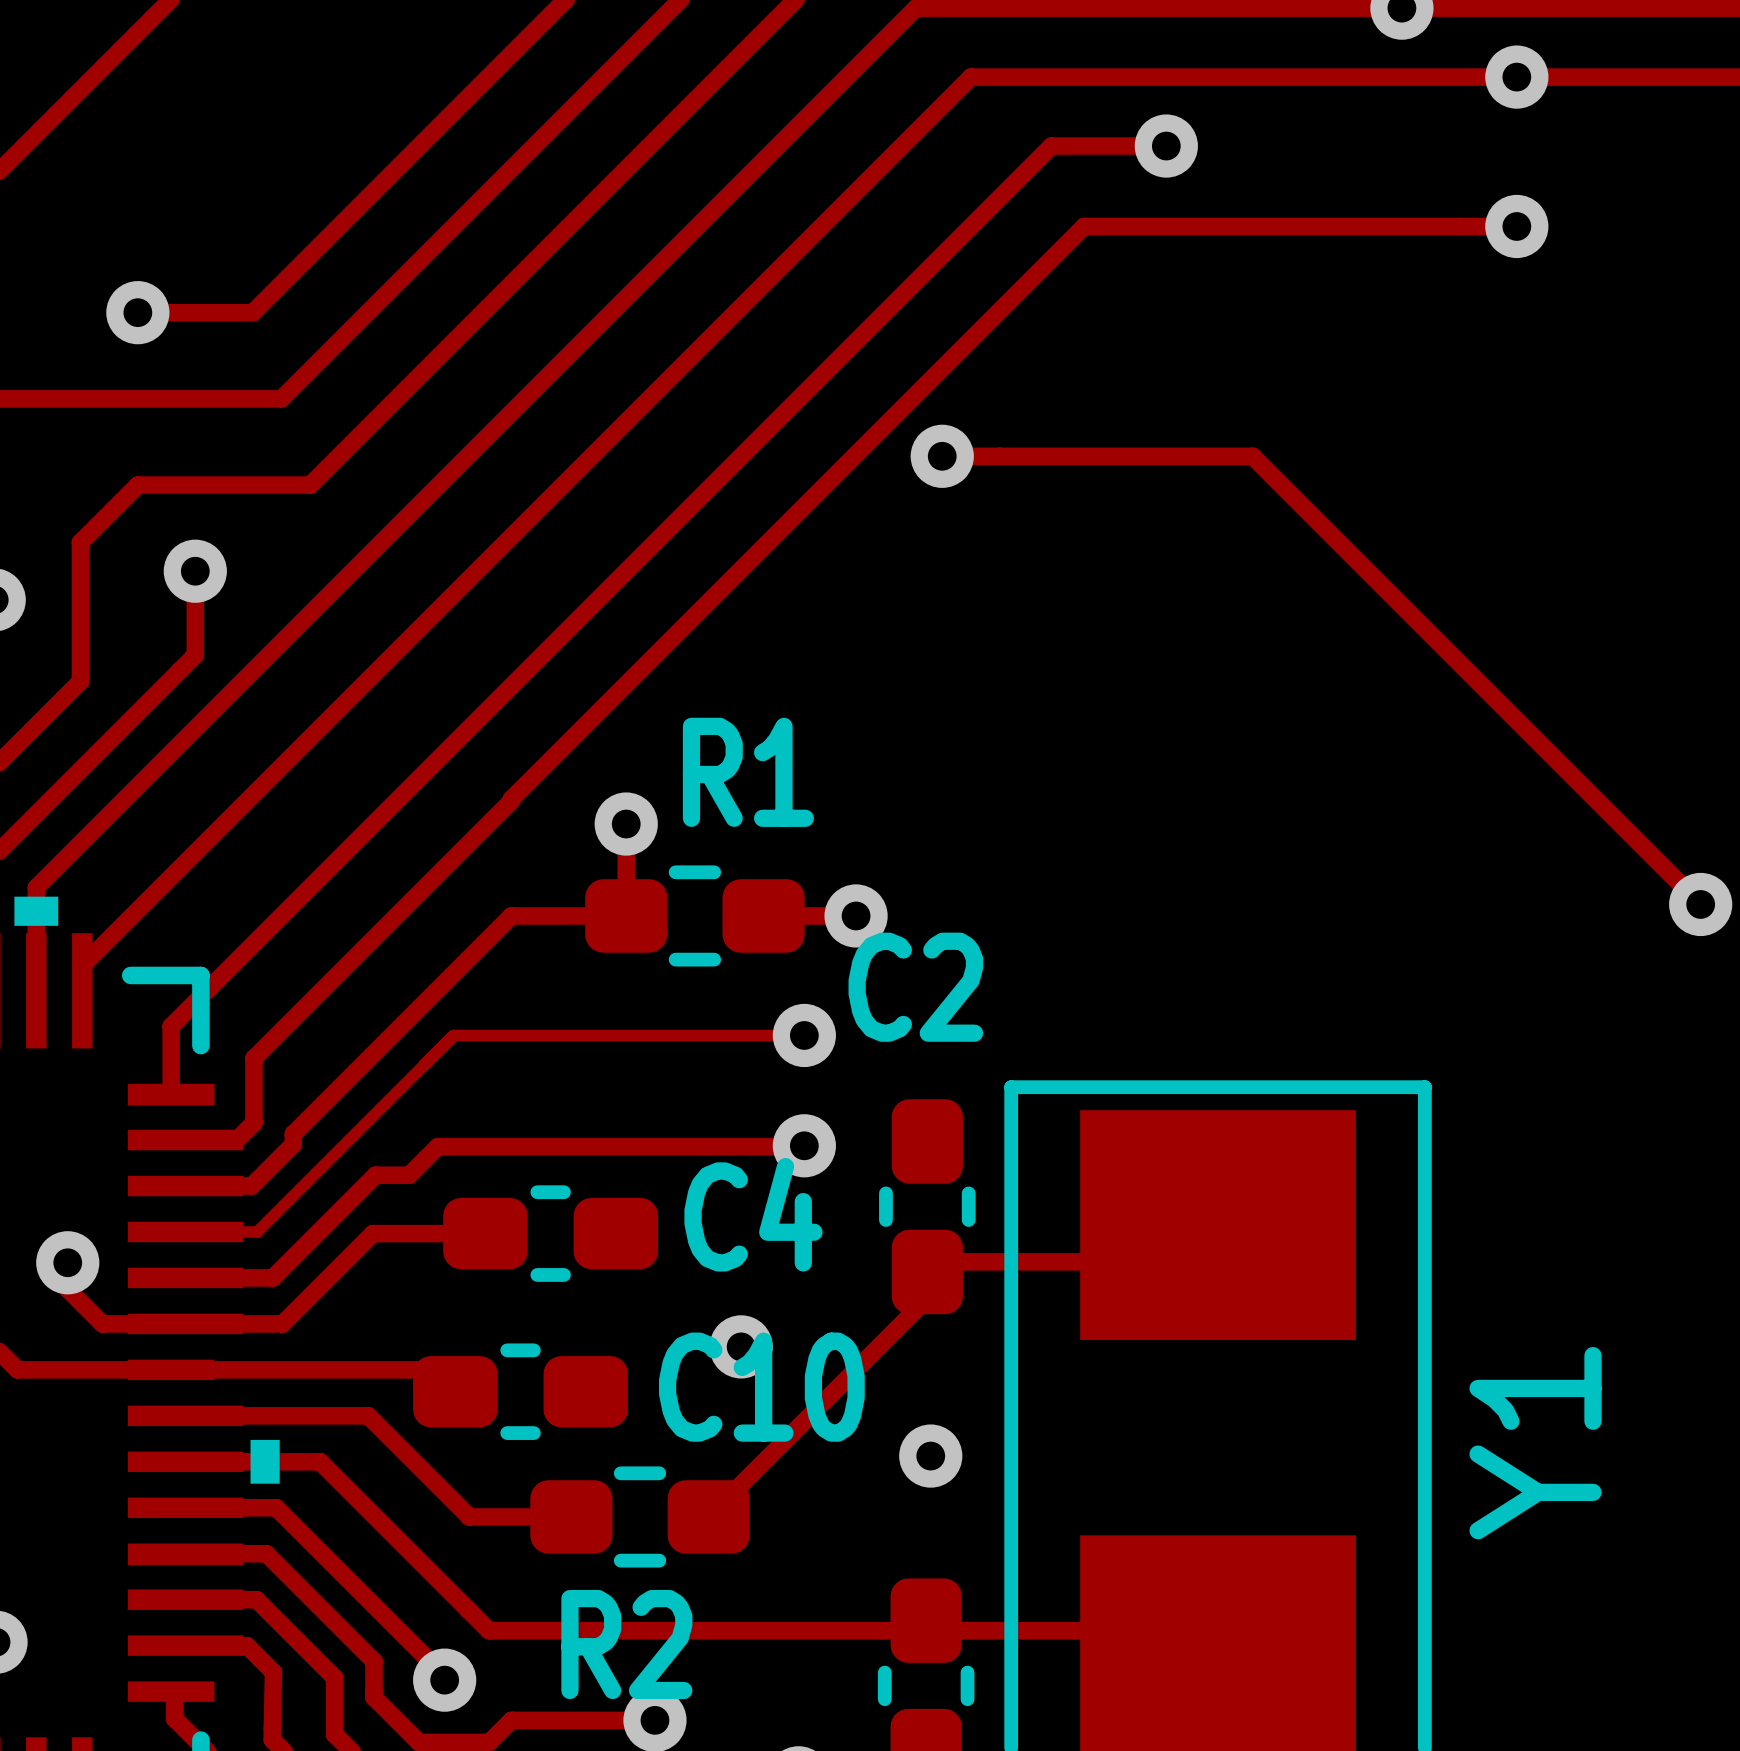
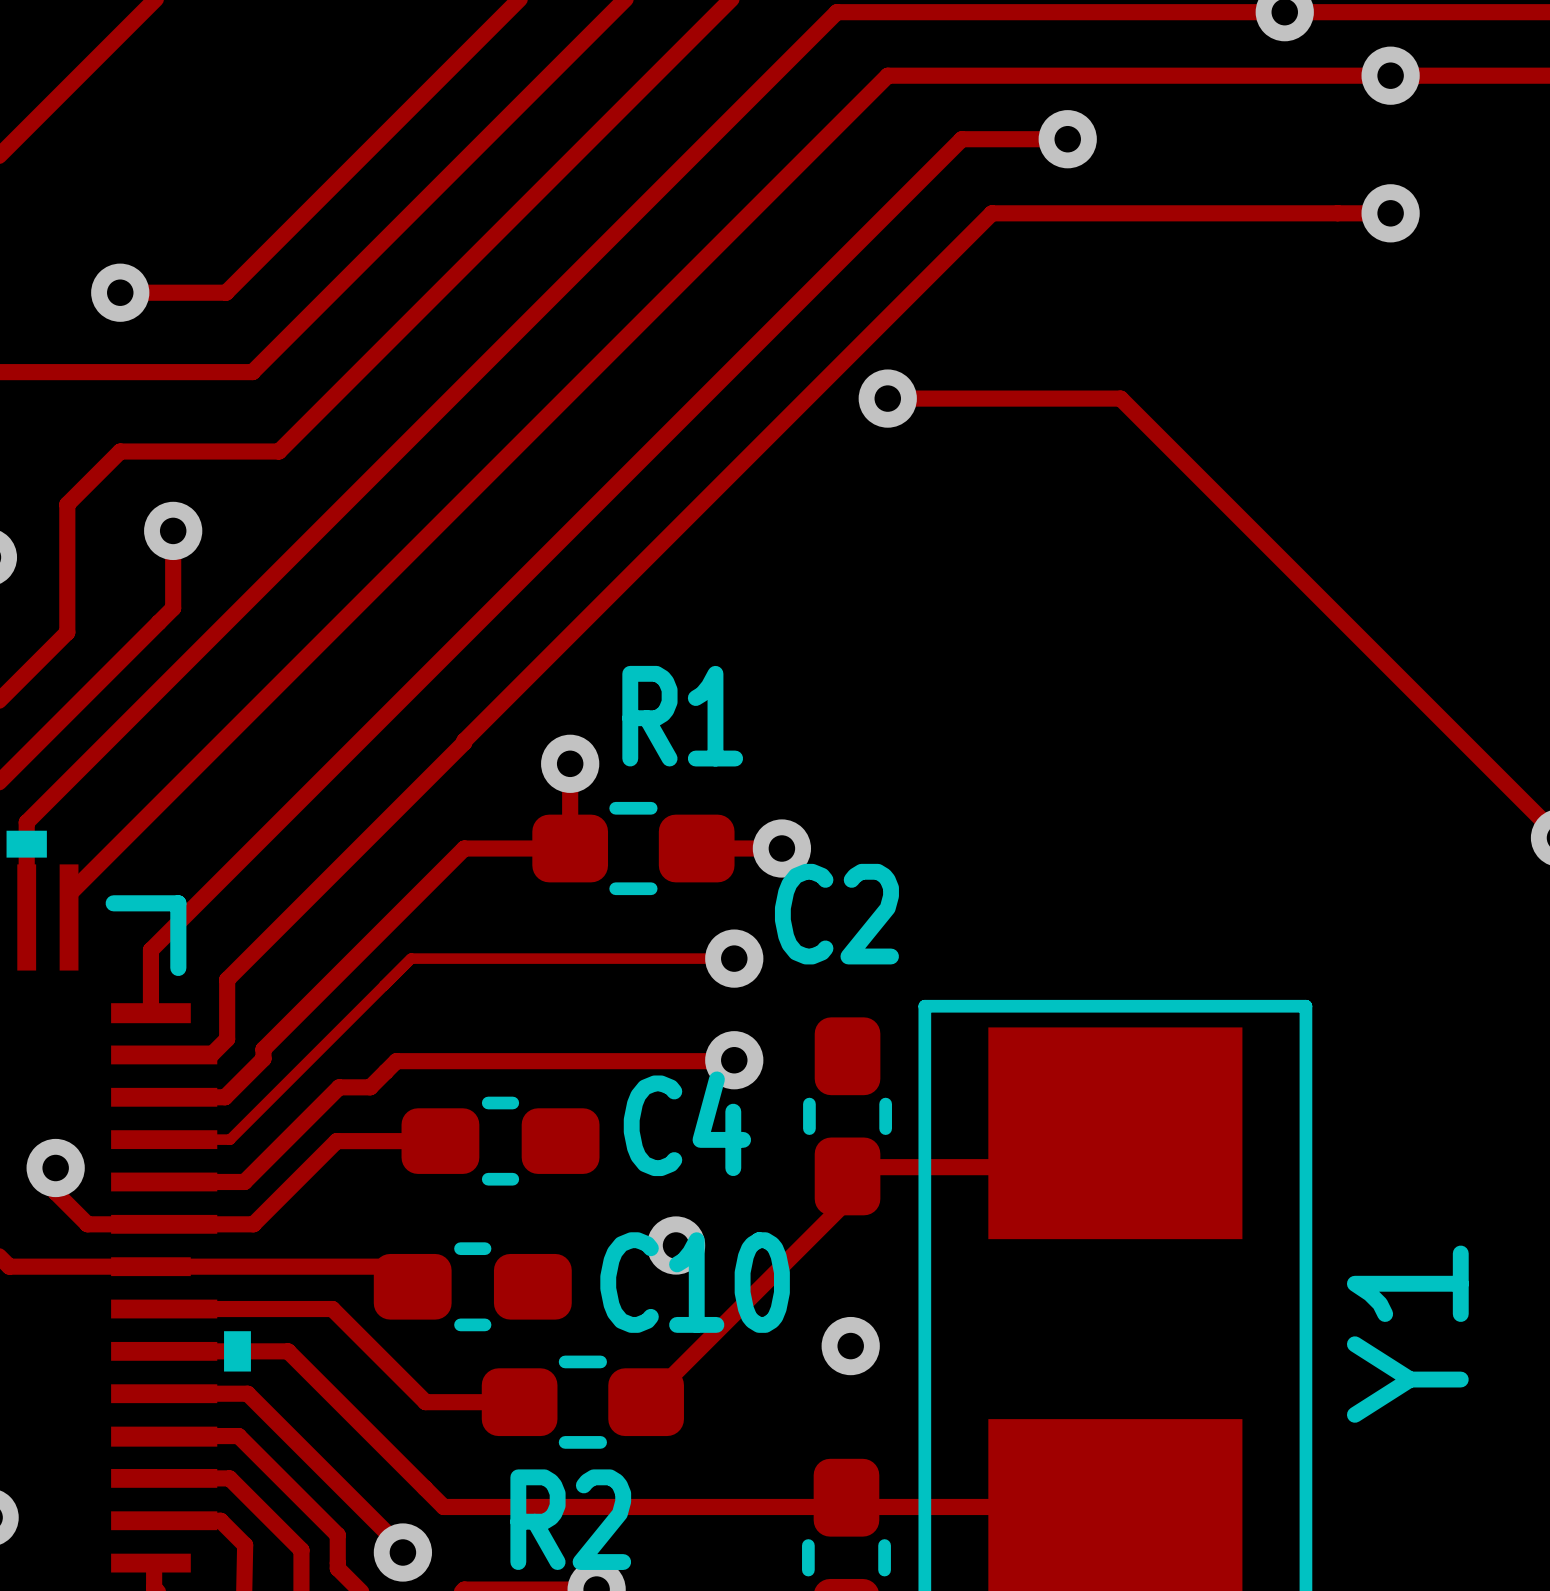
track: (942, 456) (1252, 456) -> (887, 398) (1120, 398) (1147, 425)
via position: (942, 456) -> (887, 398)

